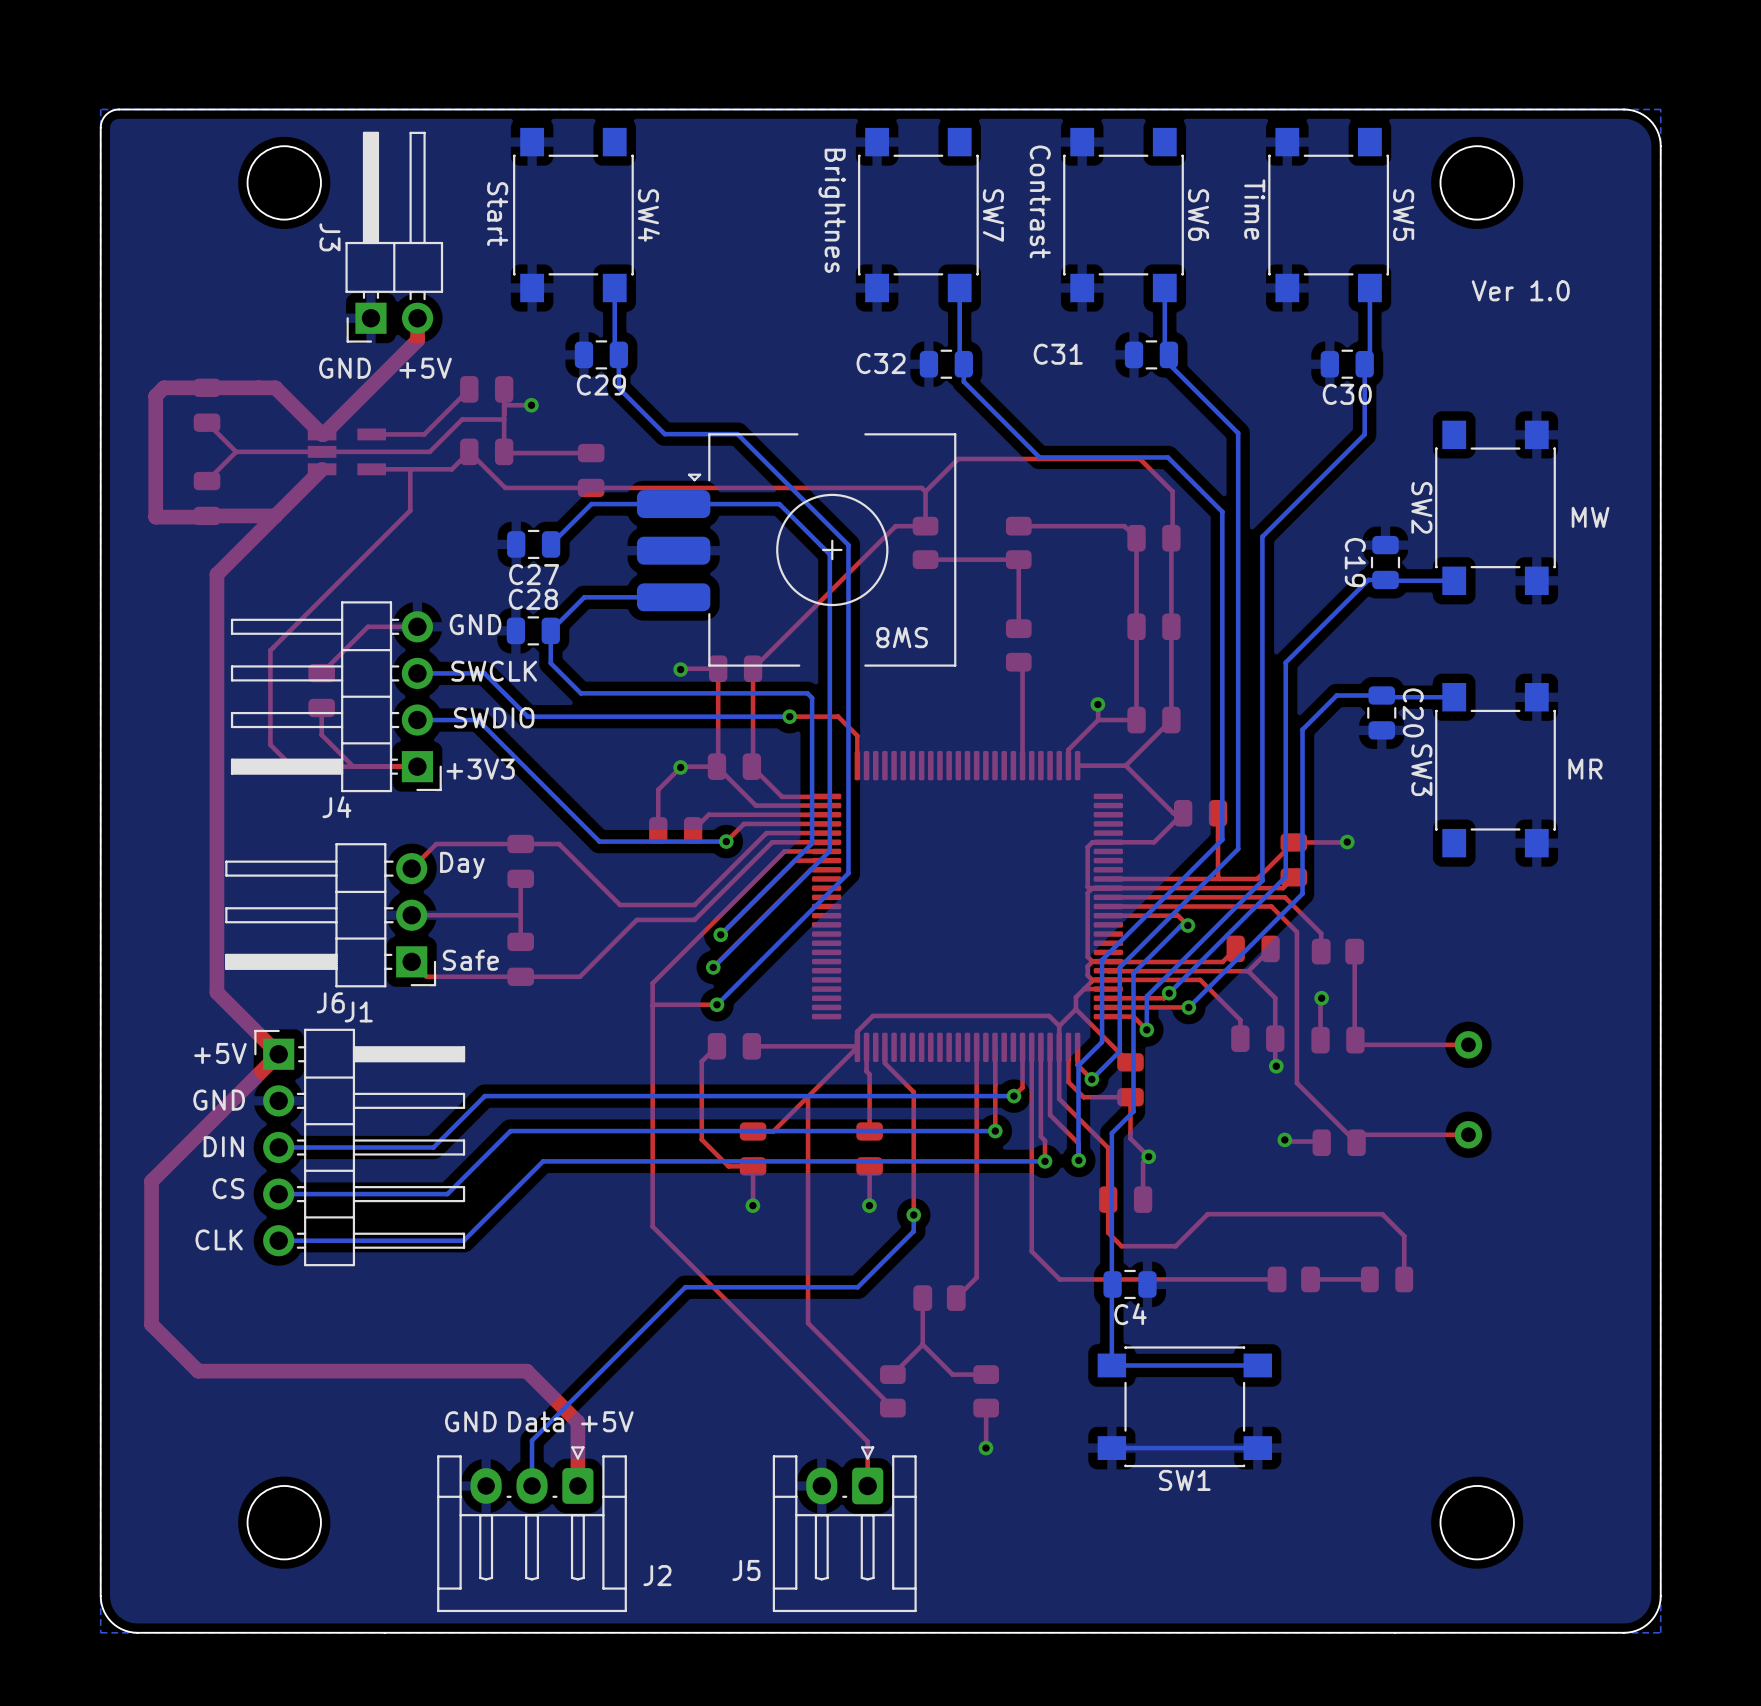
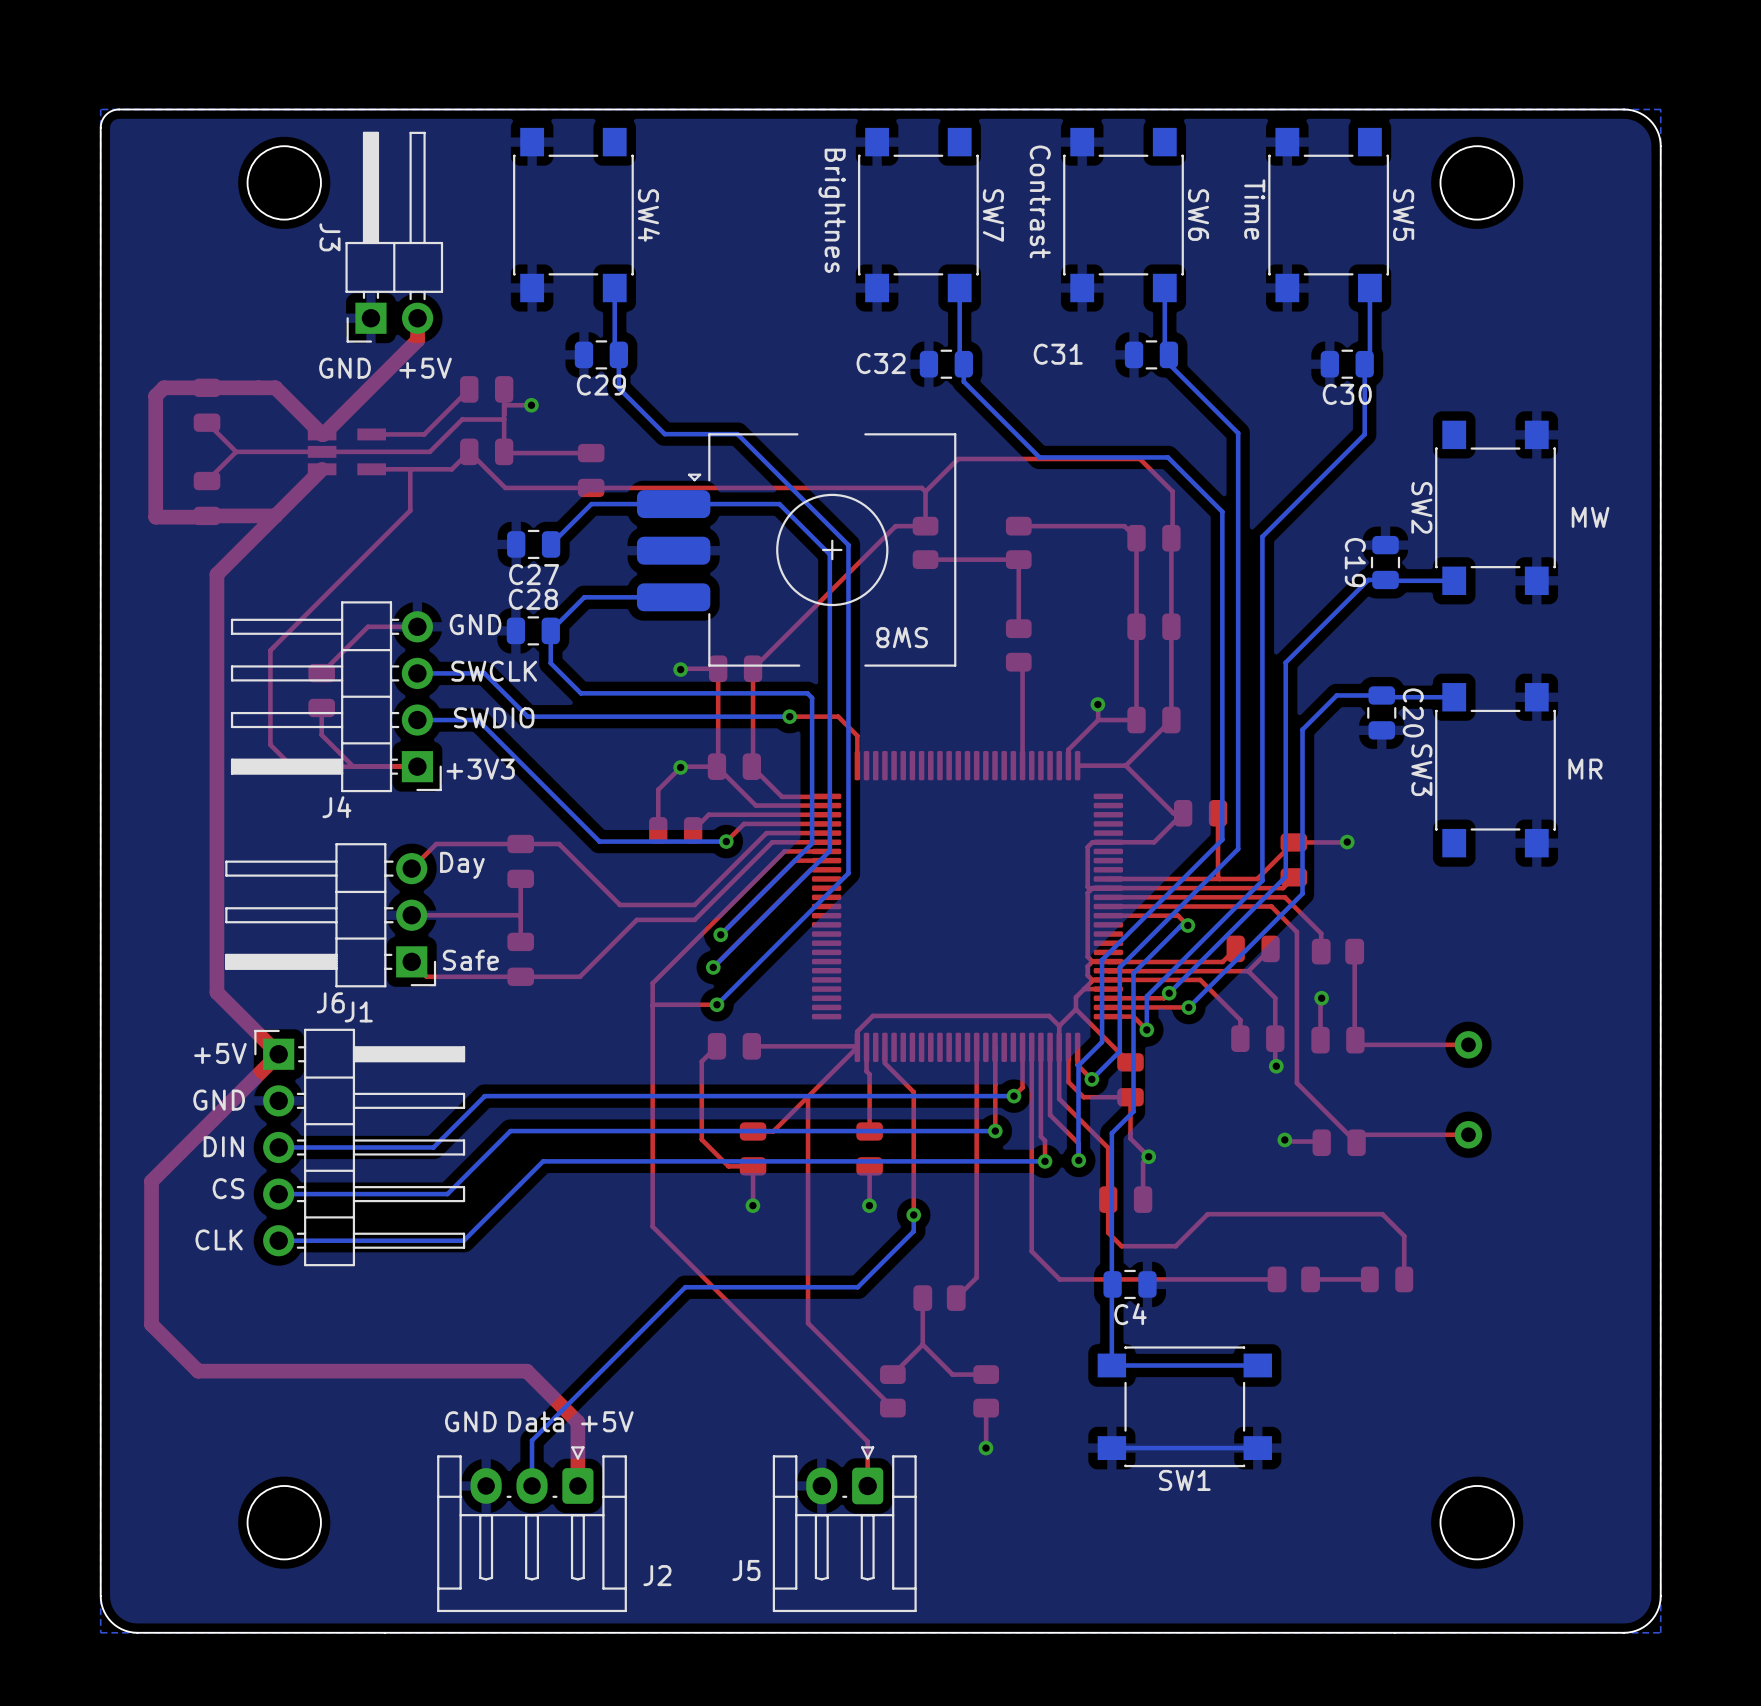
text: Start (497, 214) -> none
text: Ver 1.0 (1520, 290) -> none

